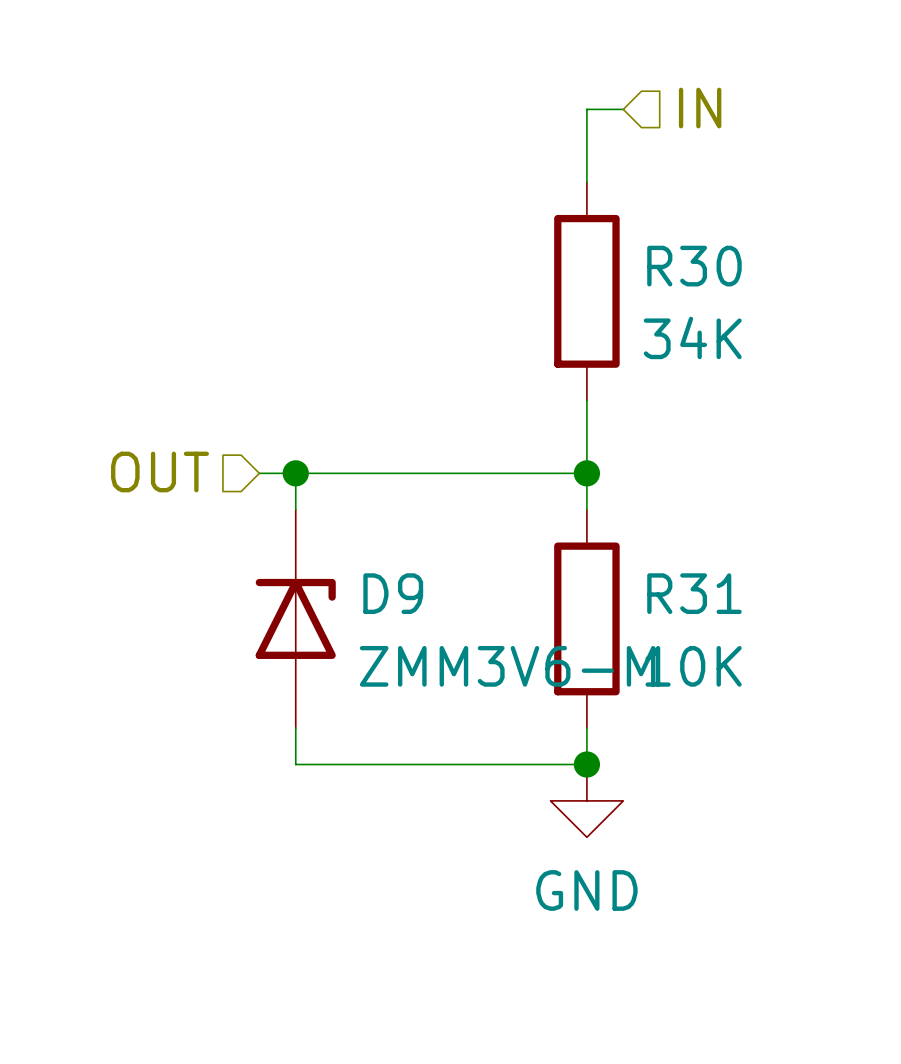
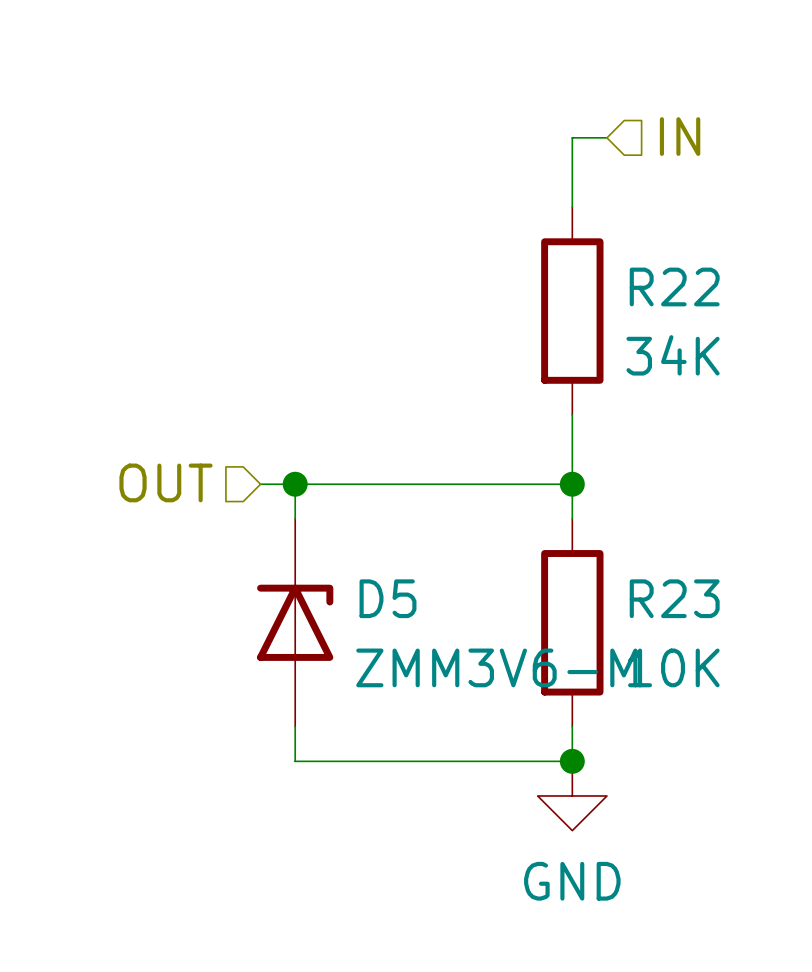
R30 name: R30 (694, 266) -> R22 (674, 286)
D9 name: D9 (393, 593) -> D5 (388, 598)
R31 name: R31 (694, 593) -> R23 (674, 598)

